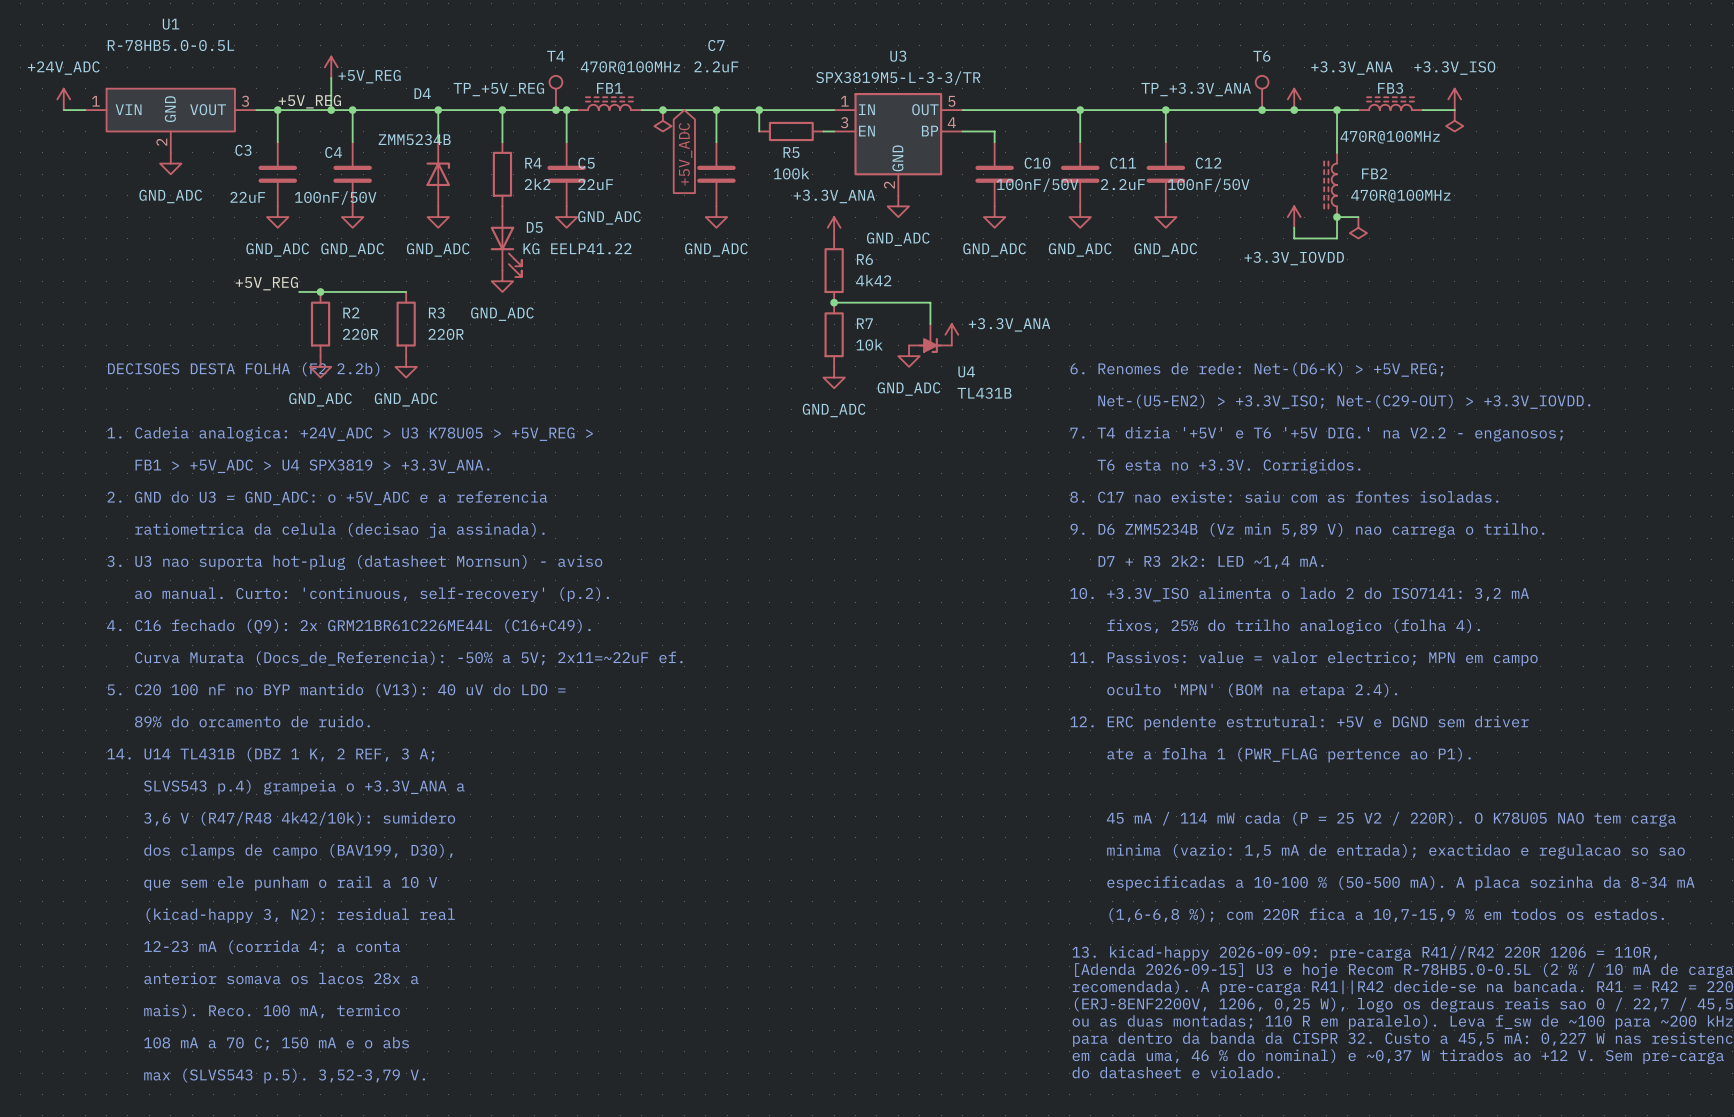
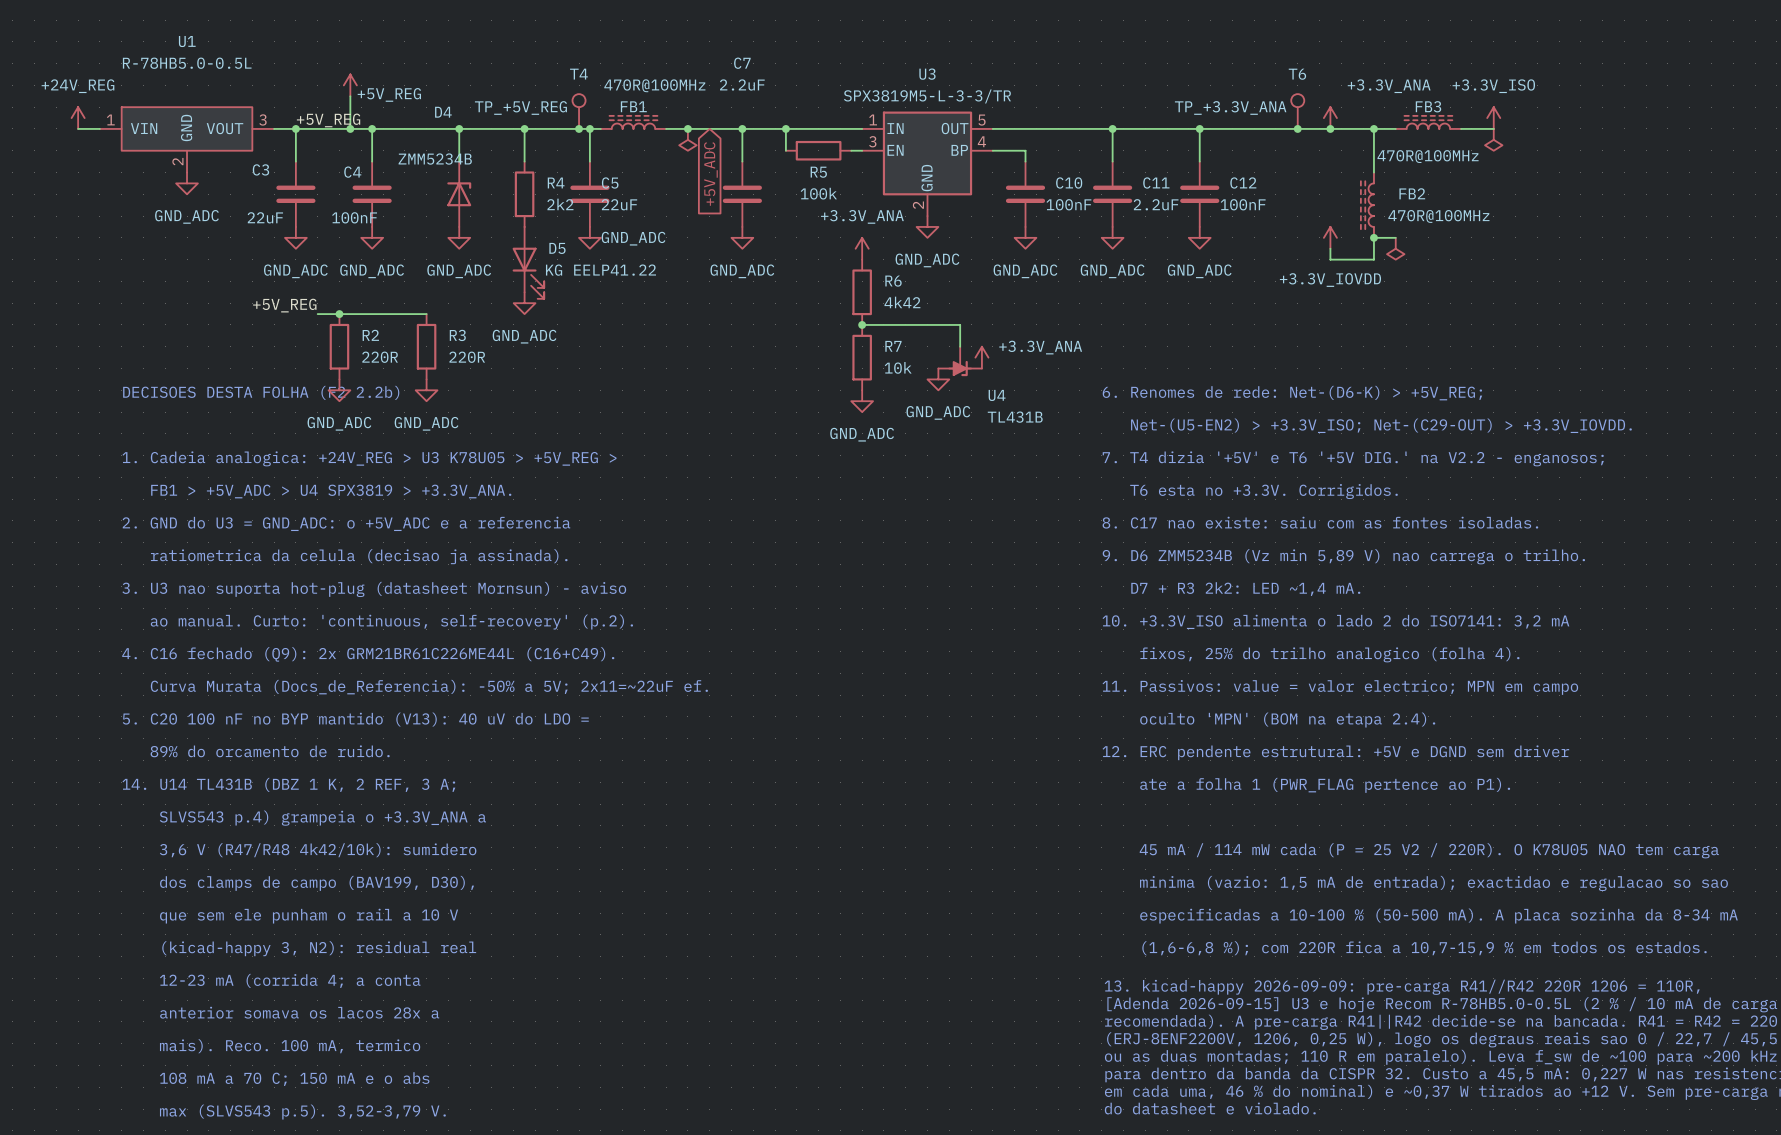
power symbol: +24V_ADC (63, 99) -> +24V_REG (78, 118)
C10 value: 100nF/50V (1037, 185) -> 100nF (1068, 204)
C12 value: 100nF/50V (1208, 185) -> 100nF (1243, 204)
C4 value: 100nF/50V (335, 198) -> 100nF (354, 217)
text: 1. Cadeia analogica: +24V_ADC > U3 K78U05 > +5V_REG > (350, 434) -> 1. Cadeia analogica: +24V_REG > U3 K78U05 > +5V_REG > (369, 458)

